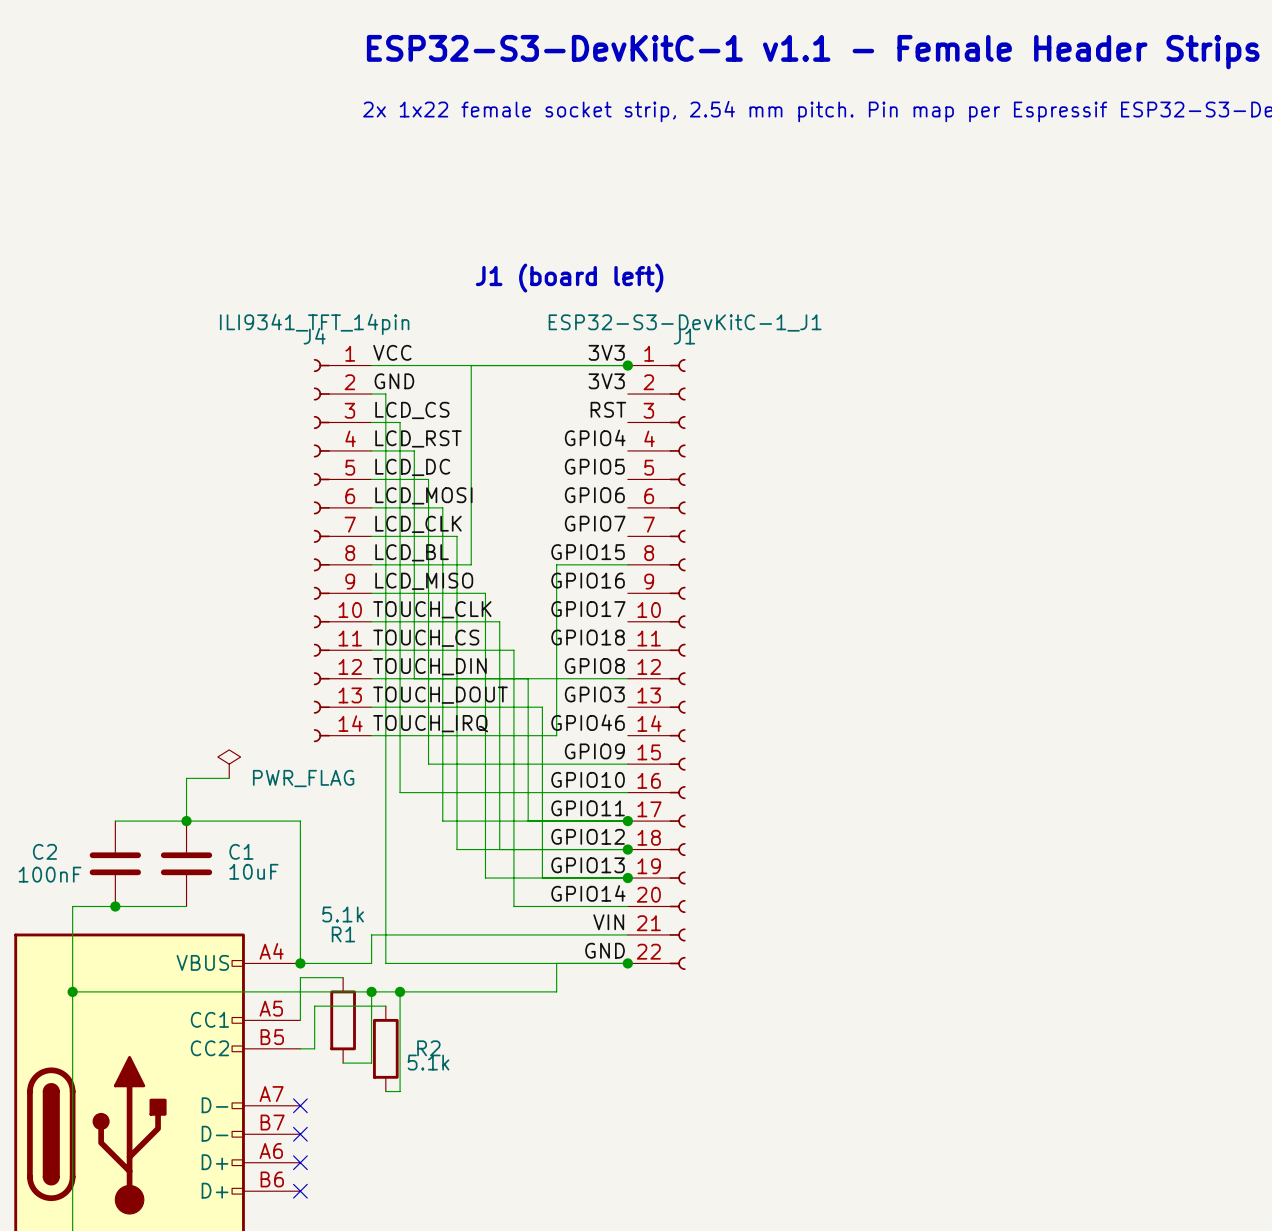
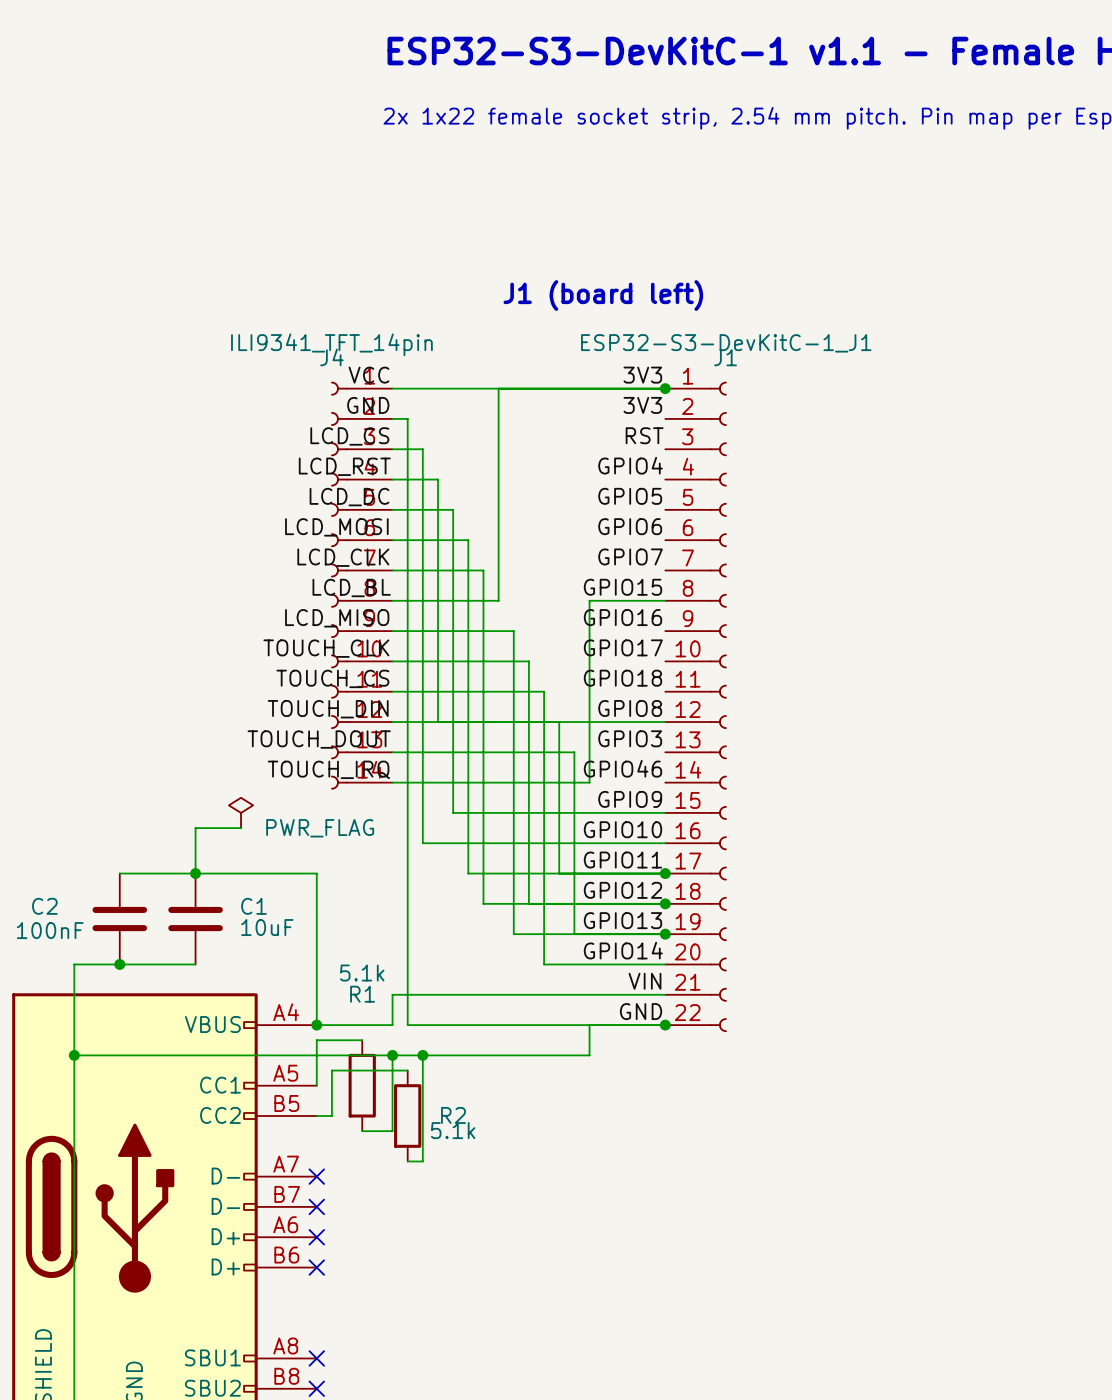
label position: VCC (392, 352) -> VCC (368, 375)
label position: GND (394, 381) -> GND (368, 405)
label position: LCD_CS (412, 410) -> LCD_CS (349, 436)
label position: LCD_RST (418, 438) -> LCD_RST (344, 466)
label position: LCD_DC (412, 467) -> LCD_DC (349, 497)
label position: LCD_MOSI (423, 495) -> LCD_MOSI (336, 527)
label position: LCD_CLK (418, 524) -> LCD_CLK (343, 557)
label position: LCD_BL (412, 552) -> LCD_BL (351, 587)
label position: LCD_MISO (424, 581) -> LCD_MISO (337, 618)
label position: TOUCH_CLK (432, 609) -> TOUCH_CLK (326, 648)
label position: TOUCH_CS (426, 638) -> TOUCH_CS (332, 678)
label position: TOUCH_DIN (429, 666) -> TOUCH_DIN (328, 709)
label position: TOUCH_DOUT (440, 695) -> TOUCH_DOUT (319, 739)
label position: TOUCH_IRQ (430, 723) -> TOUCH_IRQ (328, 769)

